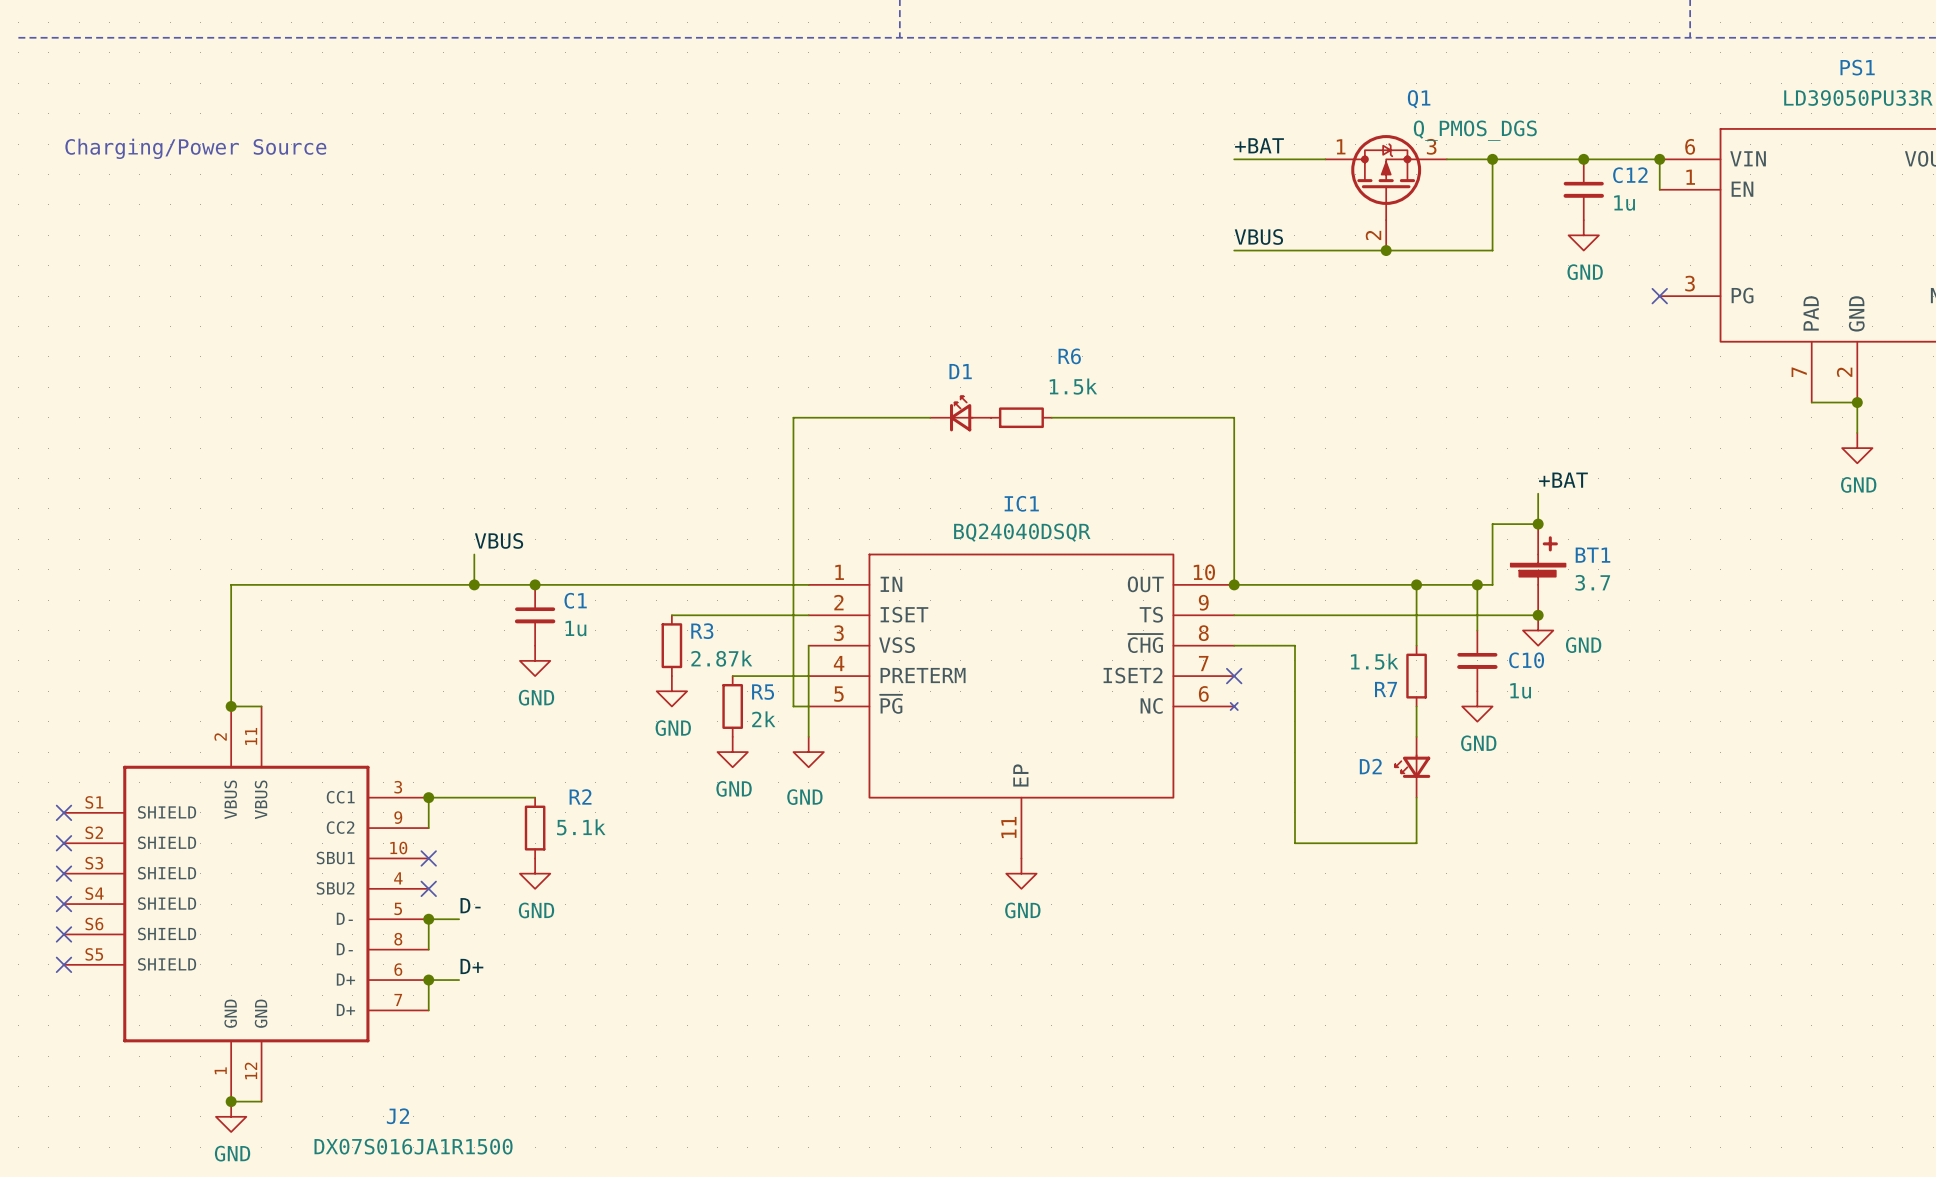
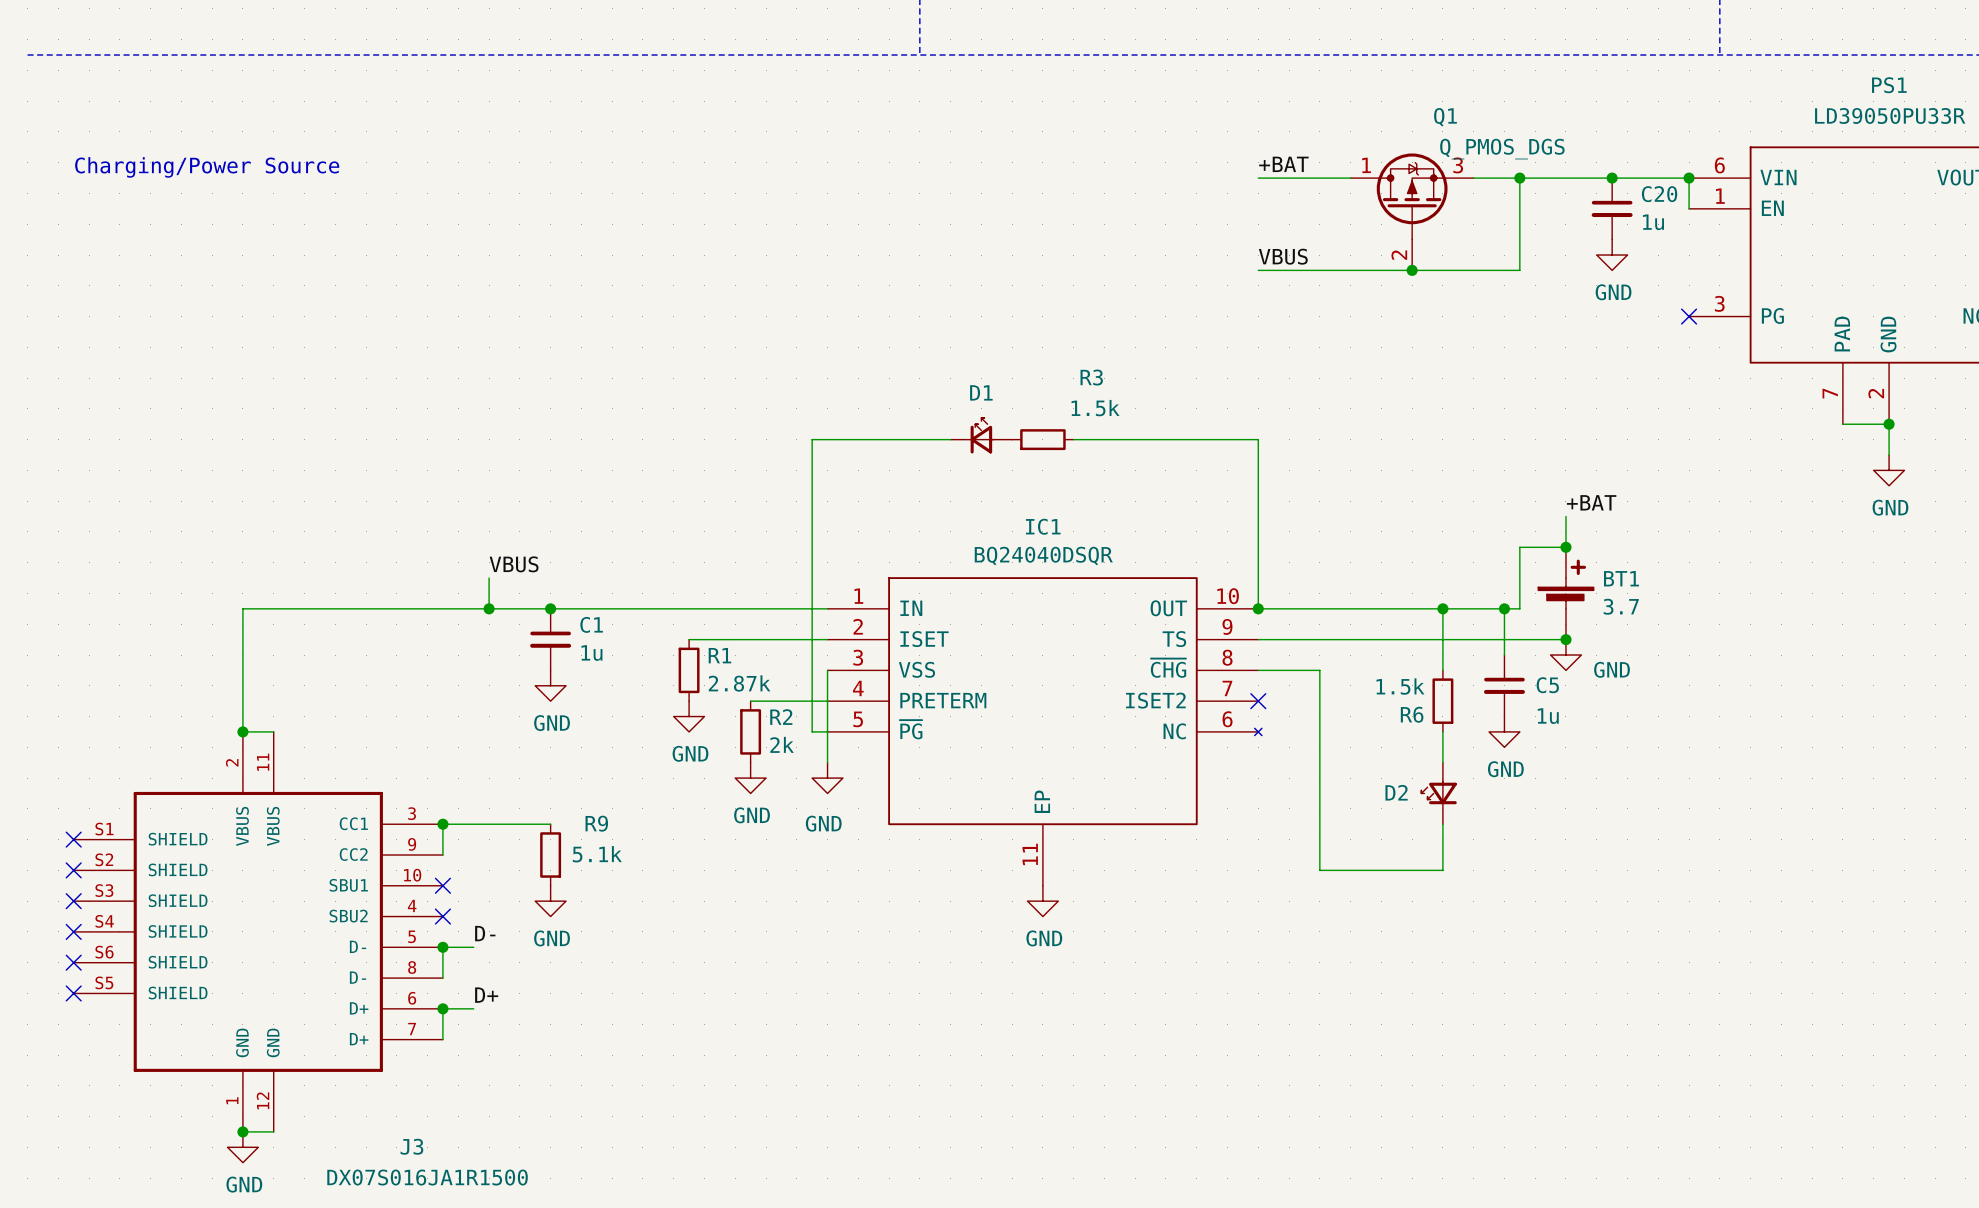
C12 name: C12 (1630, 175) -> C20 (1659, 194)
R6 name: R6 (1069, 356) -> R3 (1091, 377)
R3 name: R3 (702, 631) -> R1 (719, 655)
C10 name: C10 (1526, 660) -> C5 (1547, 685)
R7 name: R7 (1386, 689) -> R6 (1412, 714)
R5 name: R5 (763, 692) -> R2 (781, 717)
R2 name: R2 (580, 796) -> R9 (596, 823)
J2 name: J2 (397, 1116) -> J3 (411, 1146)

